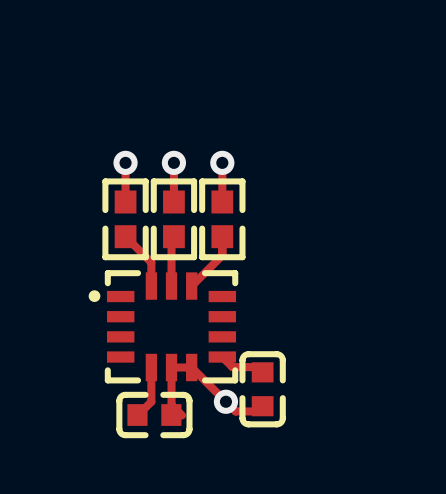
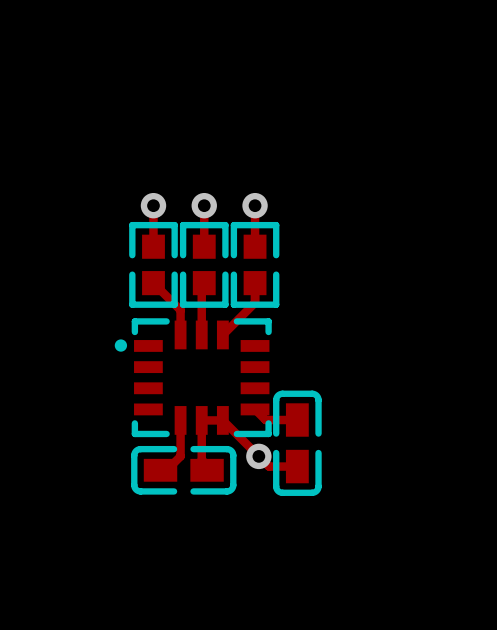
part footprint: [239, 351, 286, 428] -> [273, 390, 322, 496]
part footprint: [116, 391, 193, 439] -> [131, 445, 237, 495]

